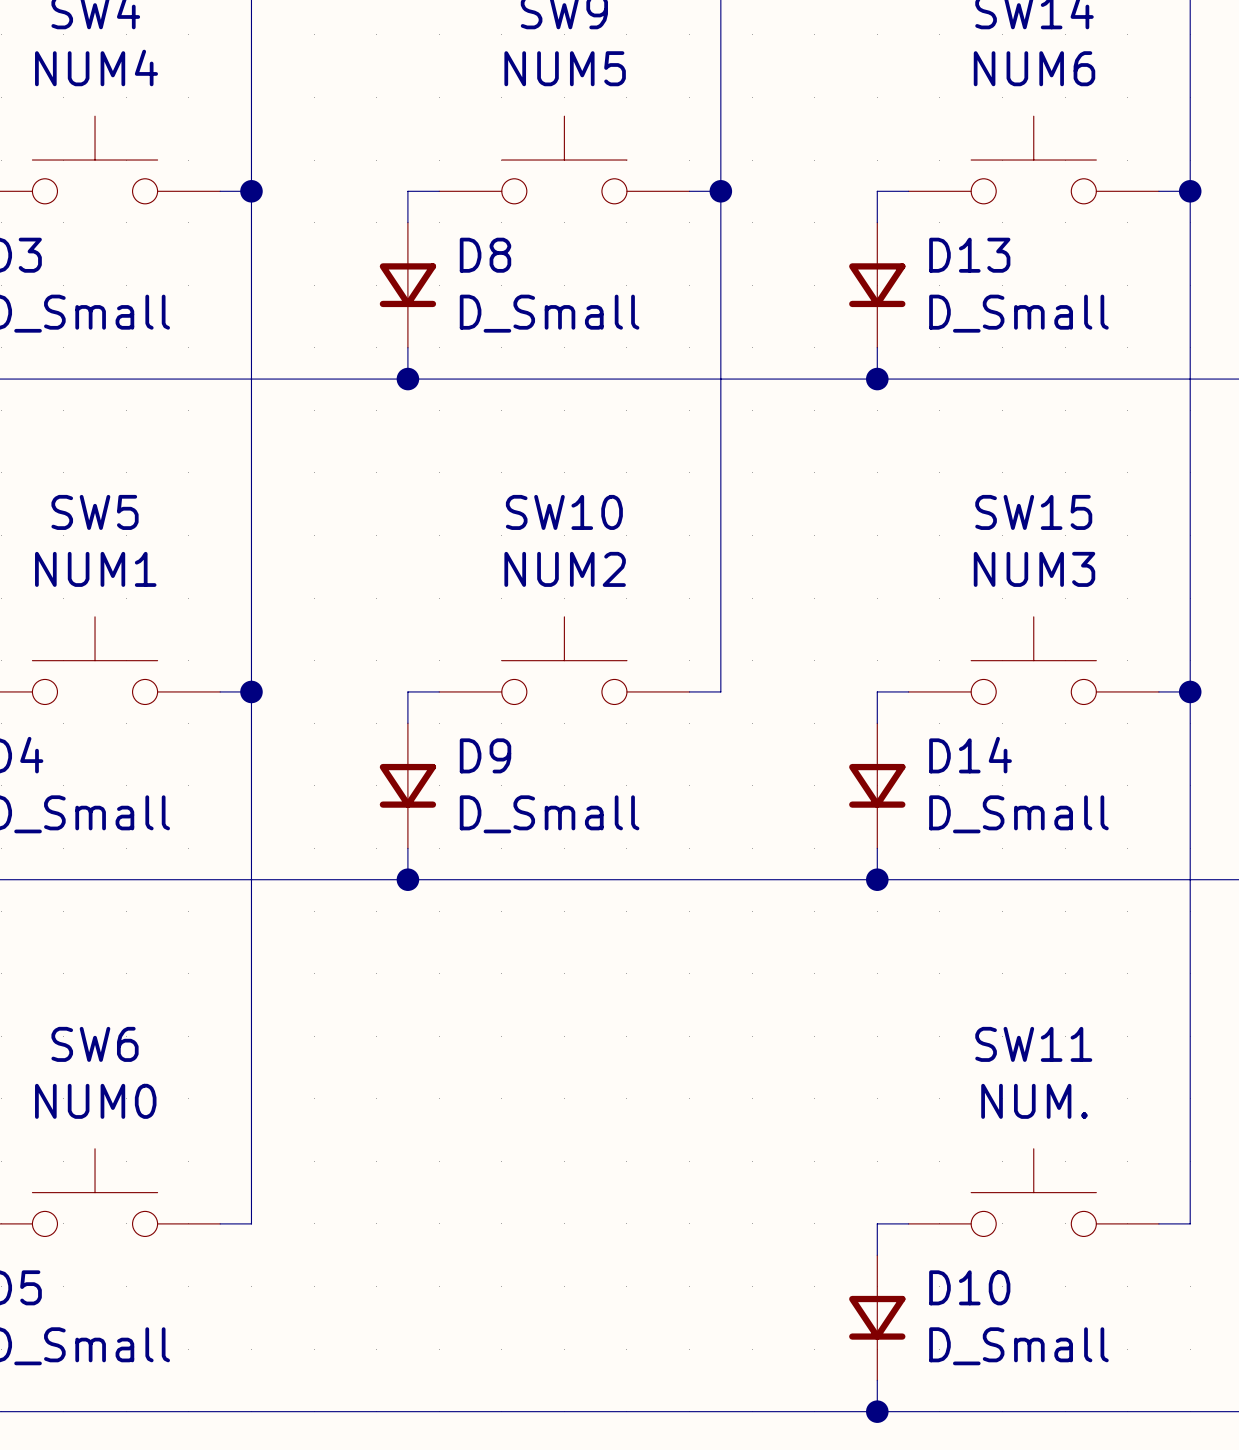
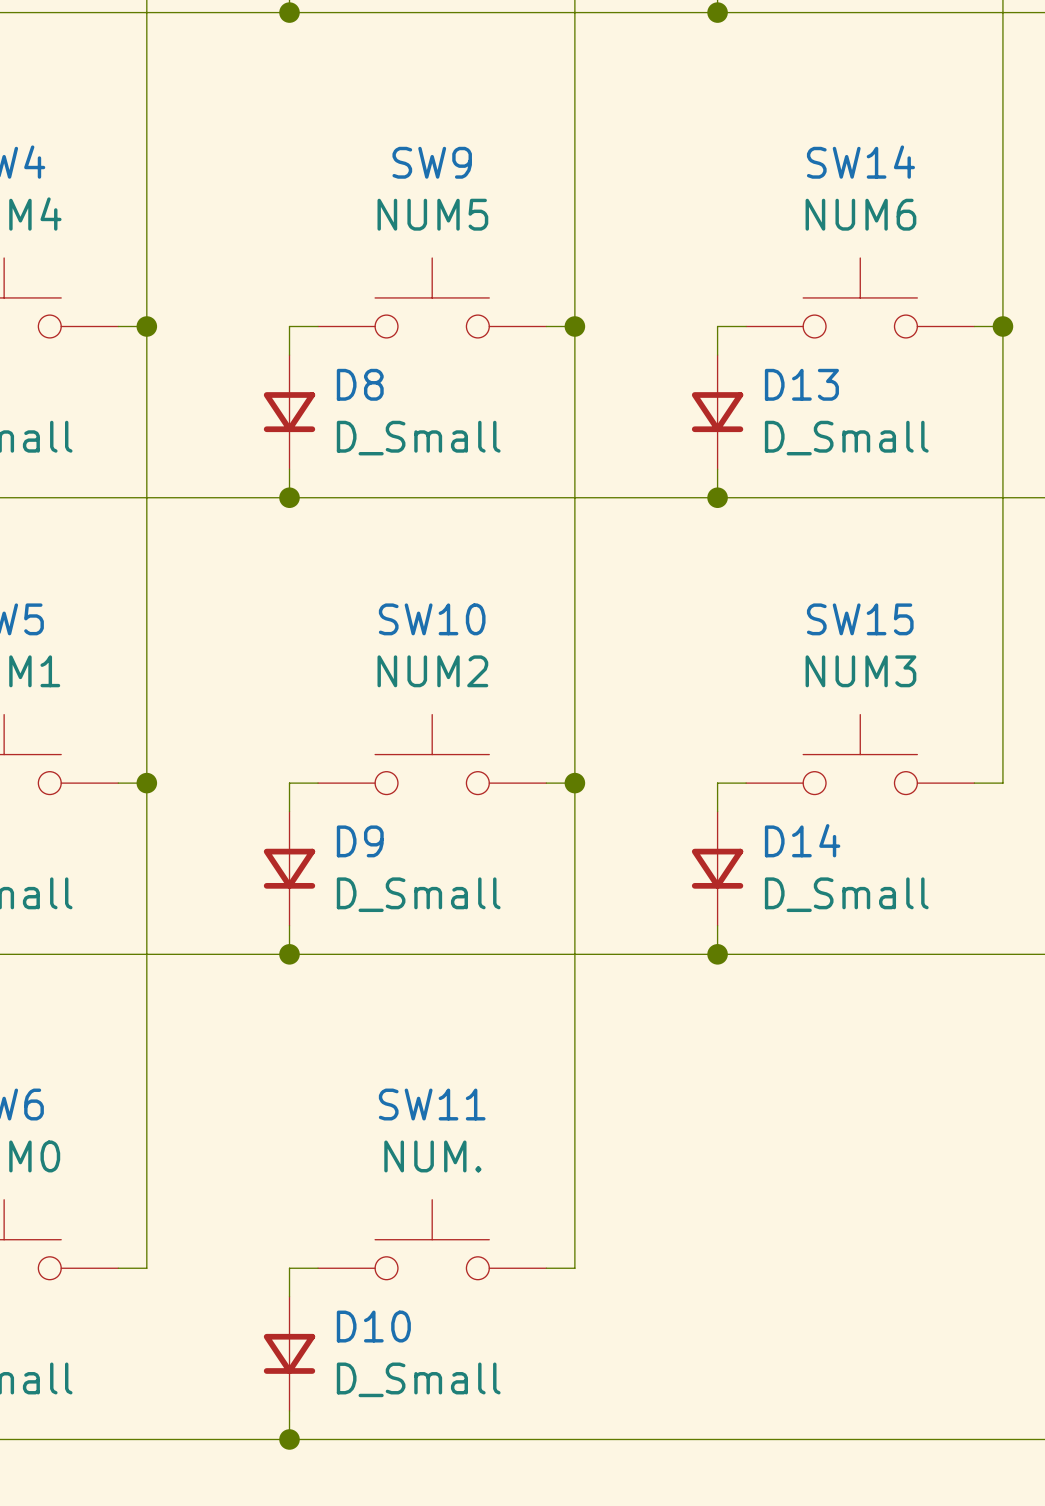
junction: none -> (574, 783)
wire: (1190, 691) (1190, 1223) (1158, 1223) -> (574, 783) (574, 1268) (546, 1268)
junction: (1190, 691) -> none
SW11 position: (1033, 1192) -> (432, 1239)
wire: (908, 1223) (877, 1223) (877, 1255) -> (318, 1268) (289, 1268) (289, 1296)
D10 position: (877, 1317) -> (289, 1353)
wire: (877, 1380) (877, 1411) -> (289, 1410) (289, 1439)
junction: none -> (289, 1439)
junction: (877, 1411) -> none

